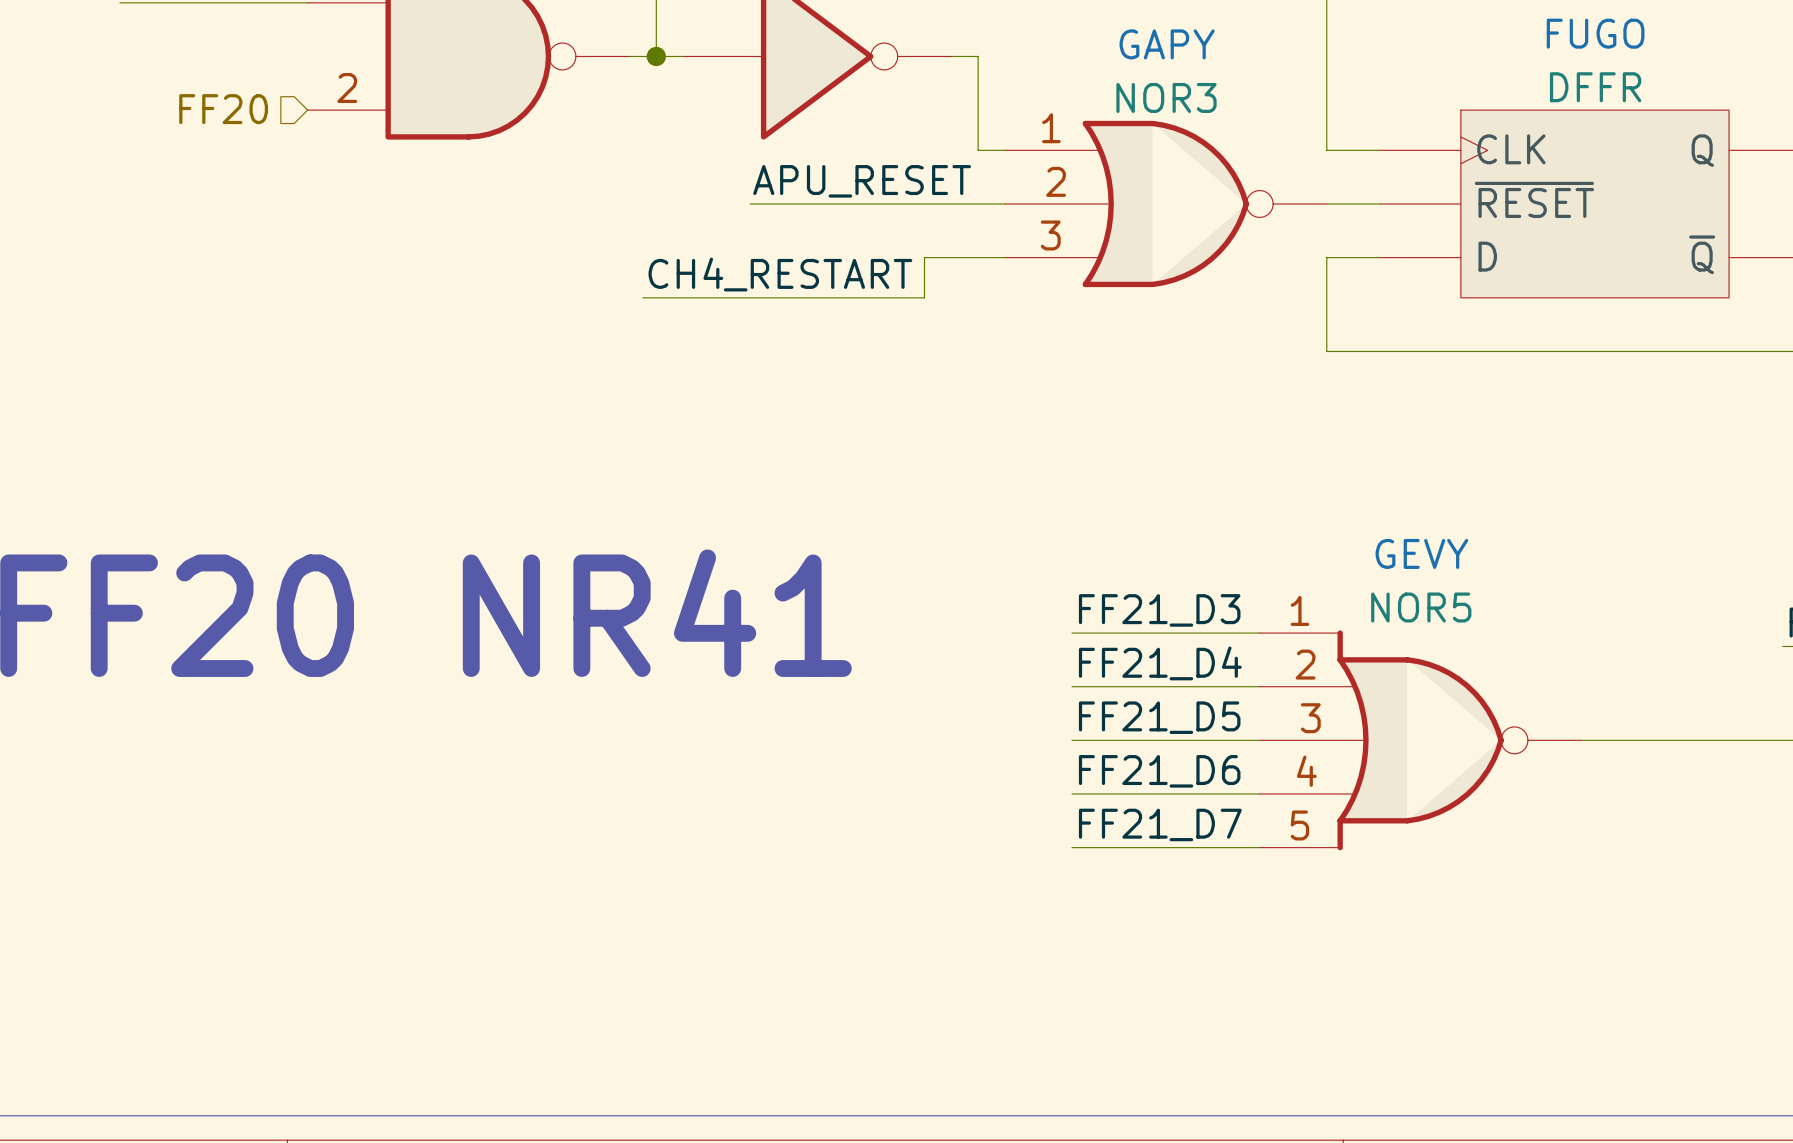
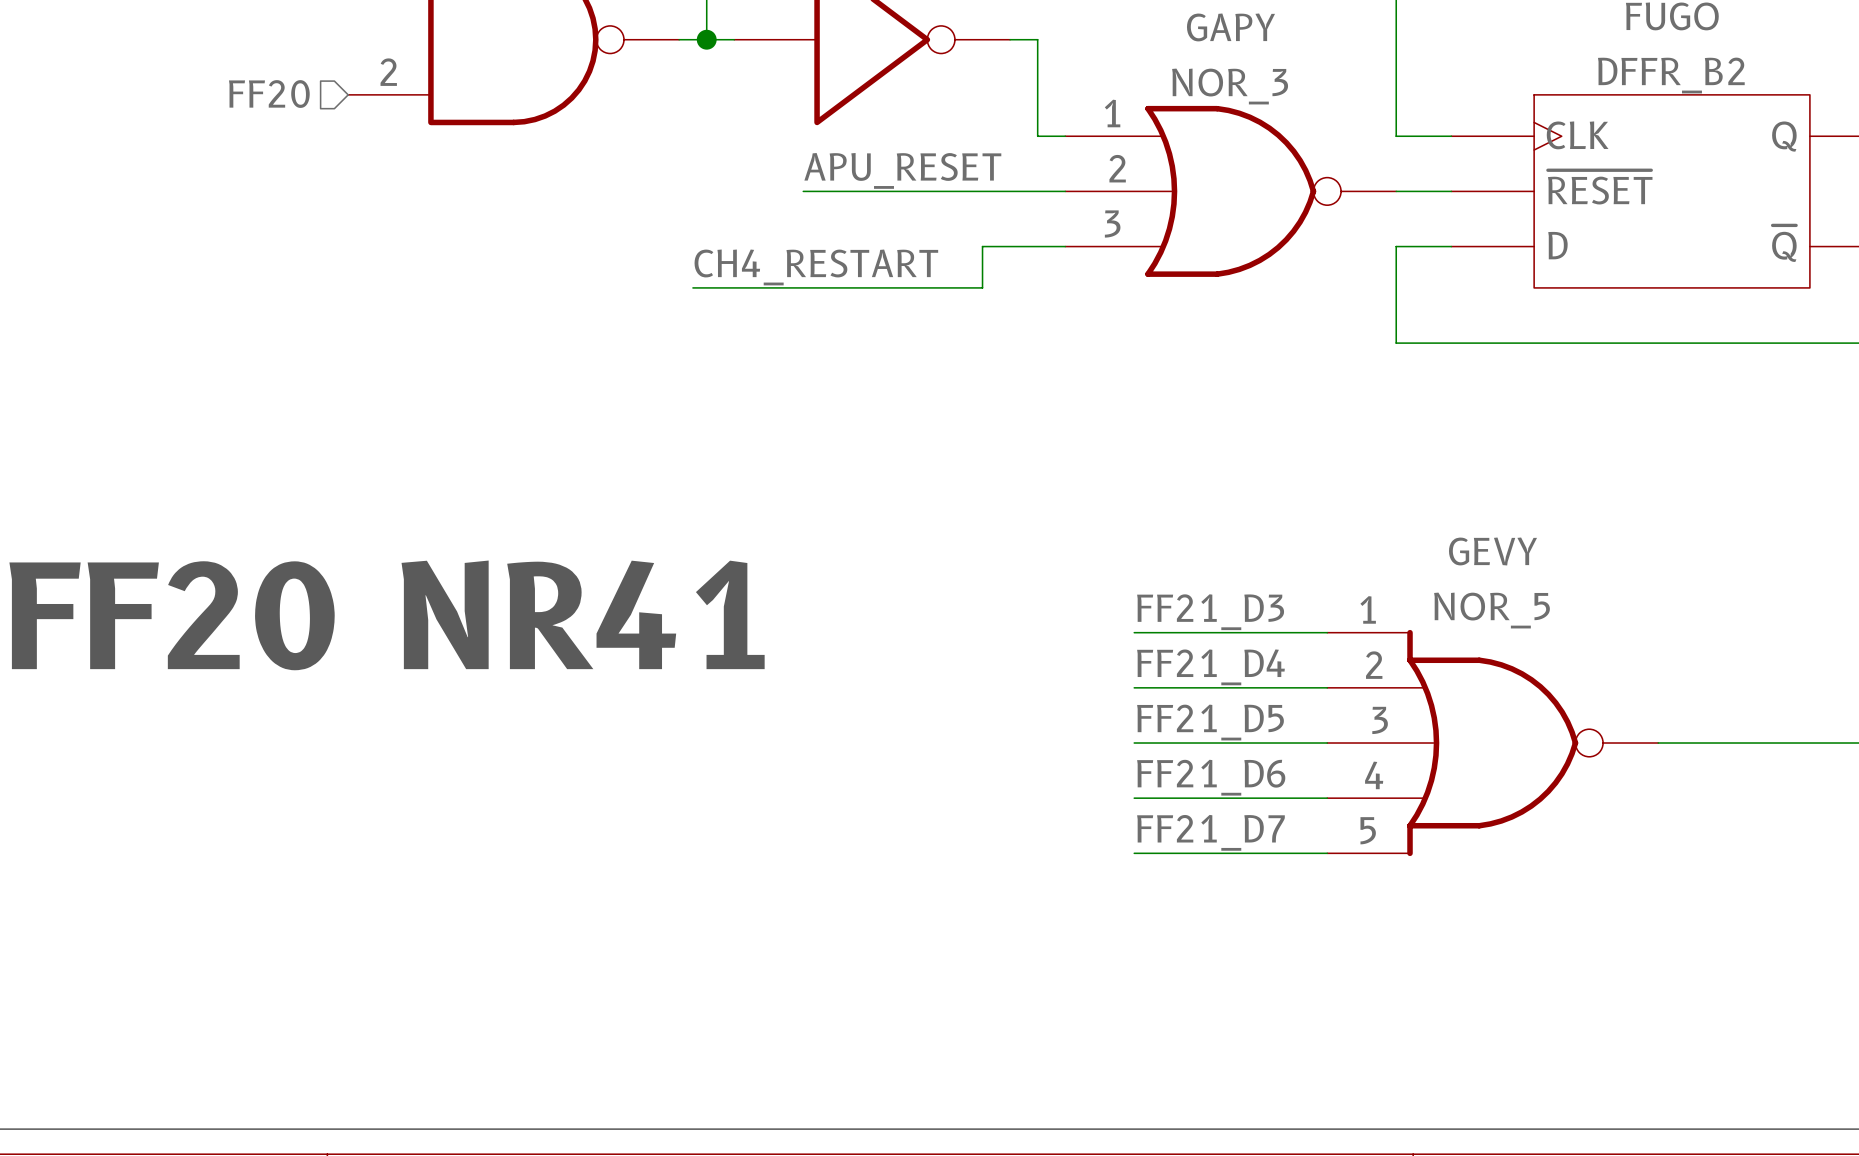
FUGO value: DFFR (1595, 87) -> DFFR_B2 (1671, 75)
GAPY value: NOR3 (1166, 97) -> NOR_3 (1230, 86)
GEVY value: NOR5 (1421, 607) -> NOR_5 (1492, 610)

